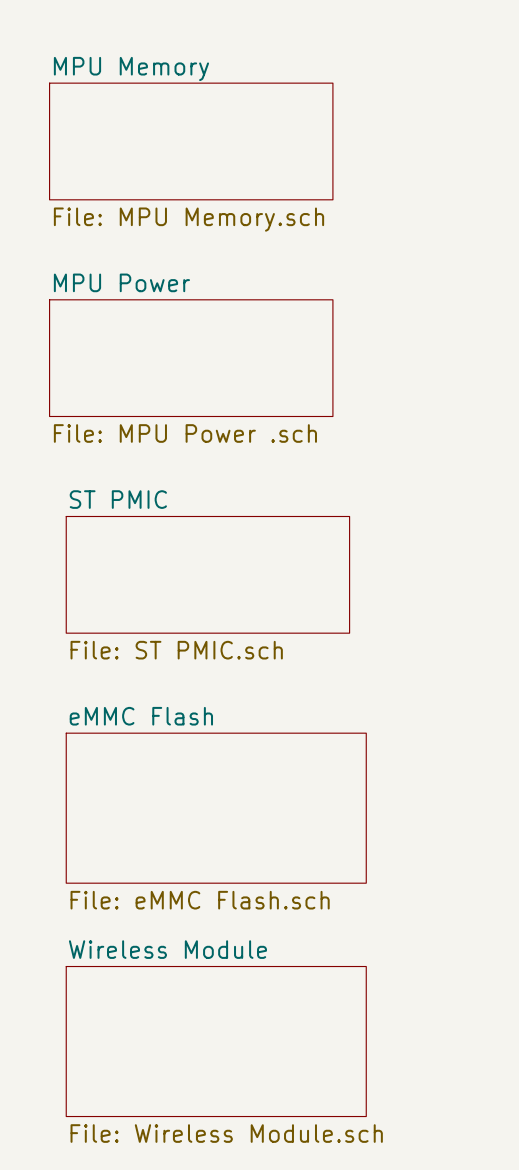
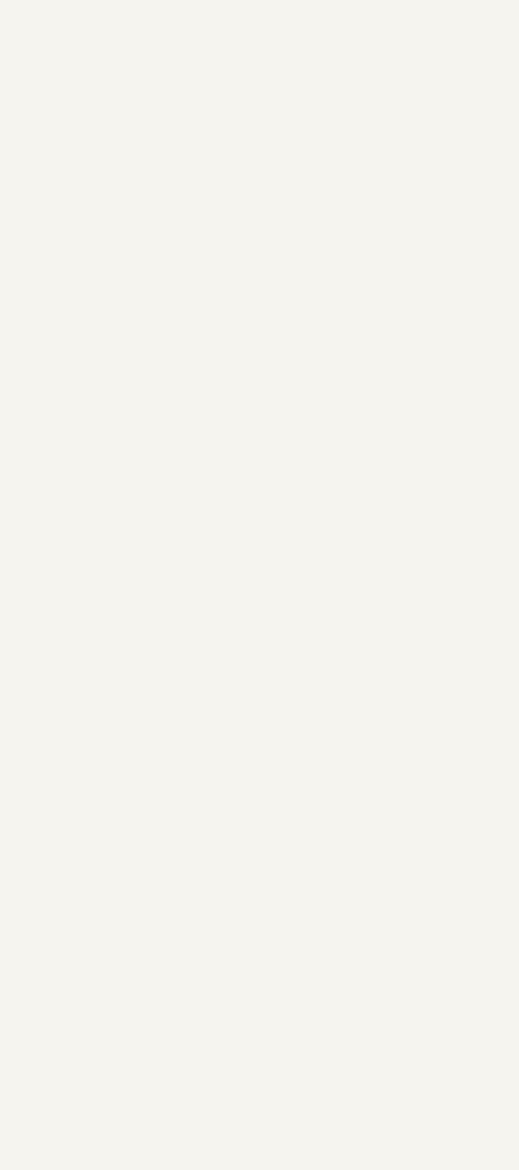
sheet MPU Memory: File: MPU Memory.sch (191, 141) -> none
sheet MPU Power: File: MPU Power .sch (191, 358) -> none
sheet ST PMIC: File: ST PMIC.sch (207, 574) -> none
sheet eMMC Flash: File: eMMC Flash.sch (216, 808) -> none
sheet Wireless Module: File: Wireless Module.sch (216, 1041) -> none

